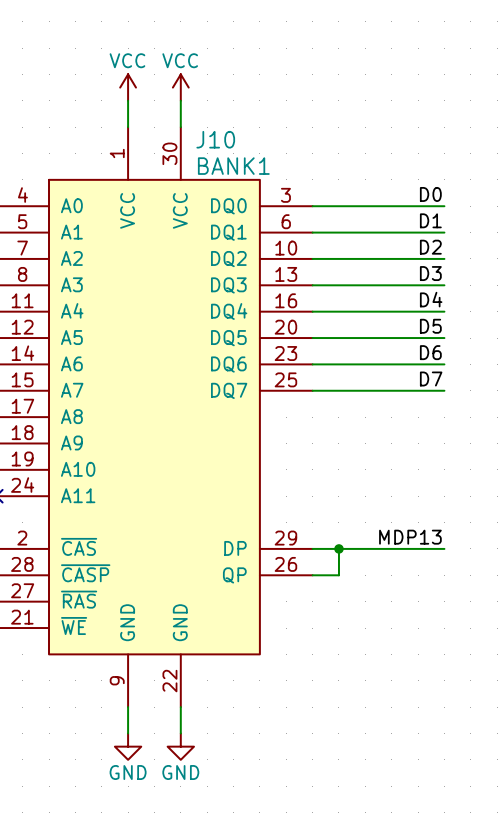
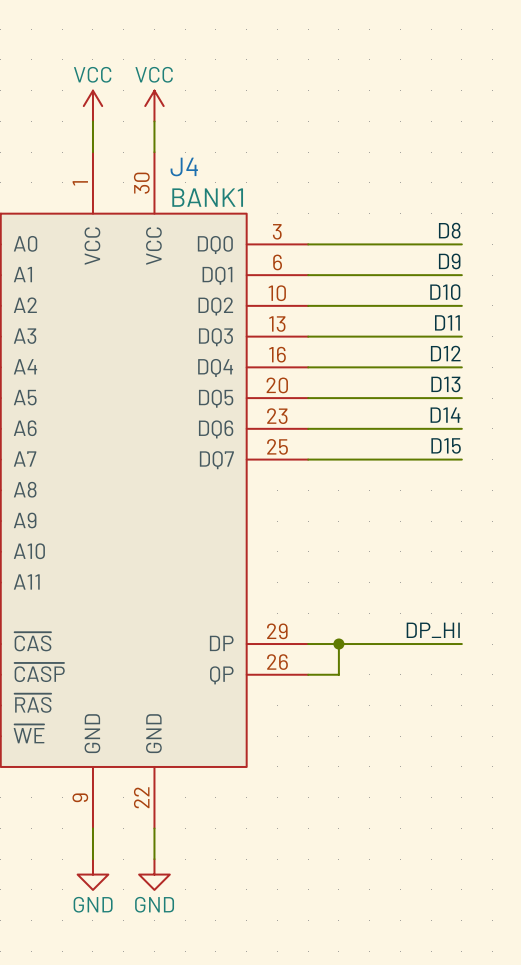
J10 name: J10 (215, 139) -> J4 (184, 166)
label: D0 (430, 194) -> D8 (449, 230)
label: D1 (430, 220) -> D9 (449, 261)
label: D2 (430, 247) -> D10 (445, 292)
label: D3 (430, 273) -> D11 (447, 322)
label: D4 (431, 299) -> D12 (445, 353)
label: D5 (430, 326) -> D13 (445, 384)
label: D6 (430, 352) -> D14 (445, 415)
label: D7 (431, 378) -> D15 (446, 445)
label: MDP13 (410, 537) -> DP_HI (433, 630)

